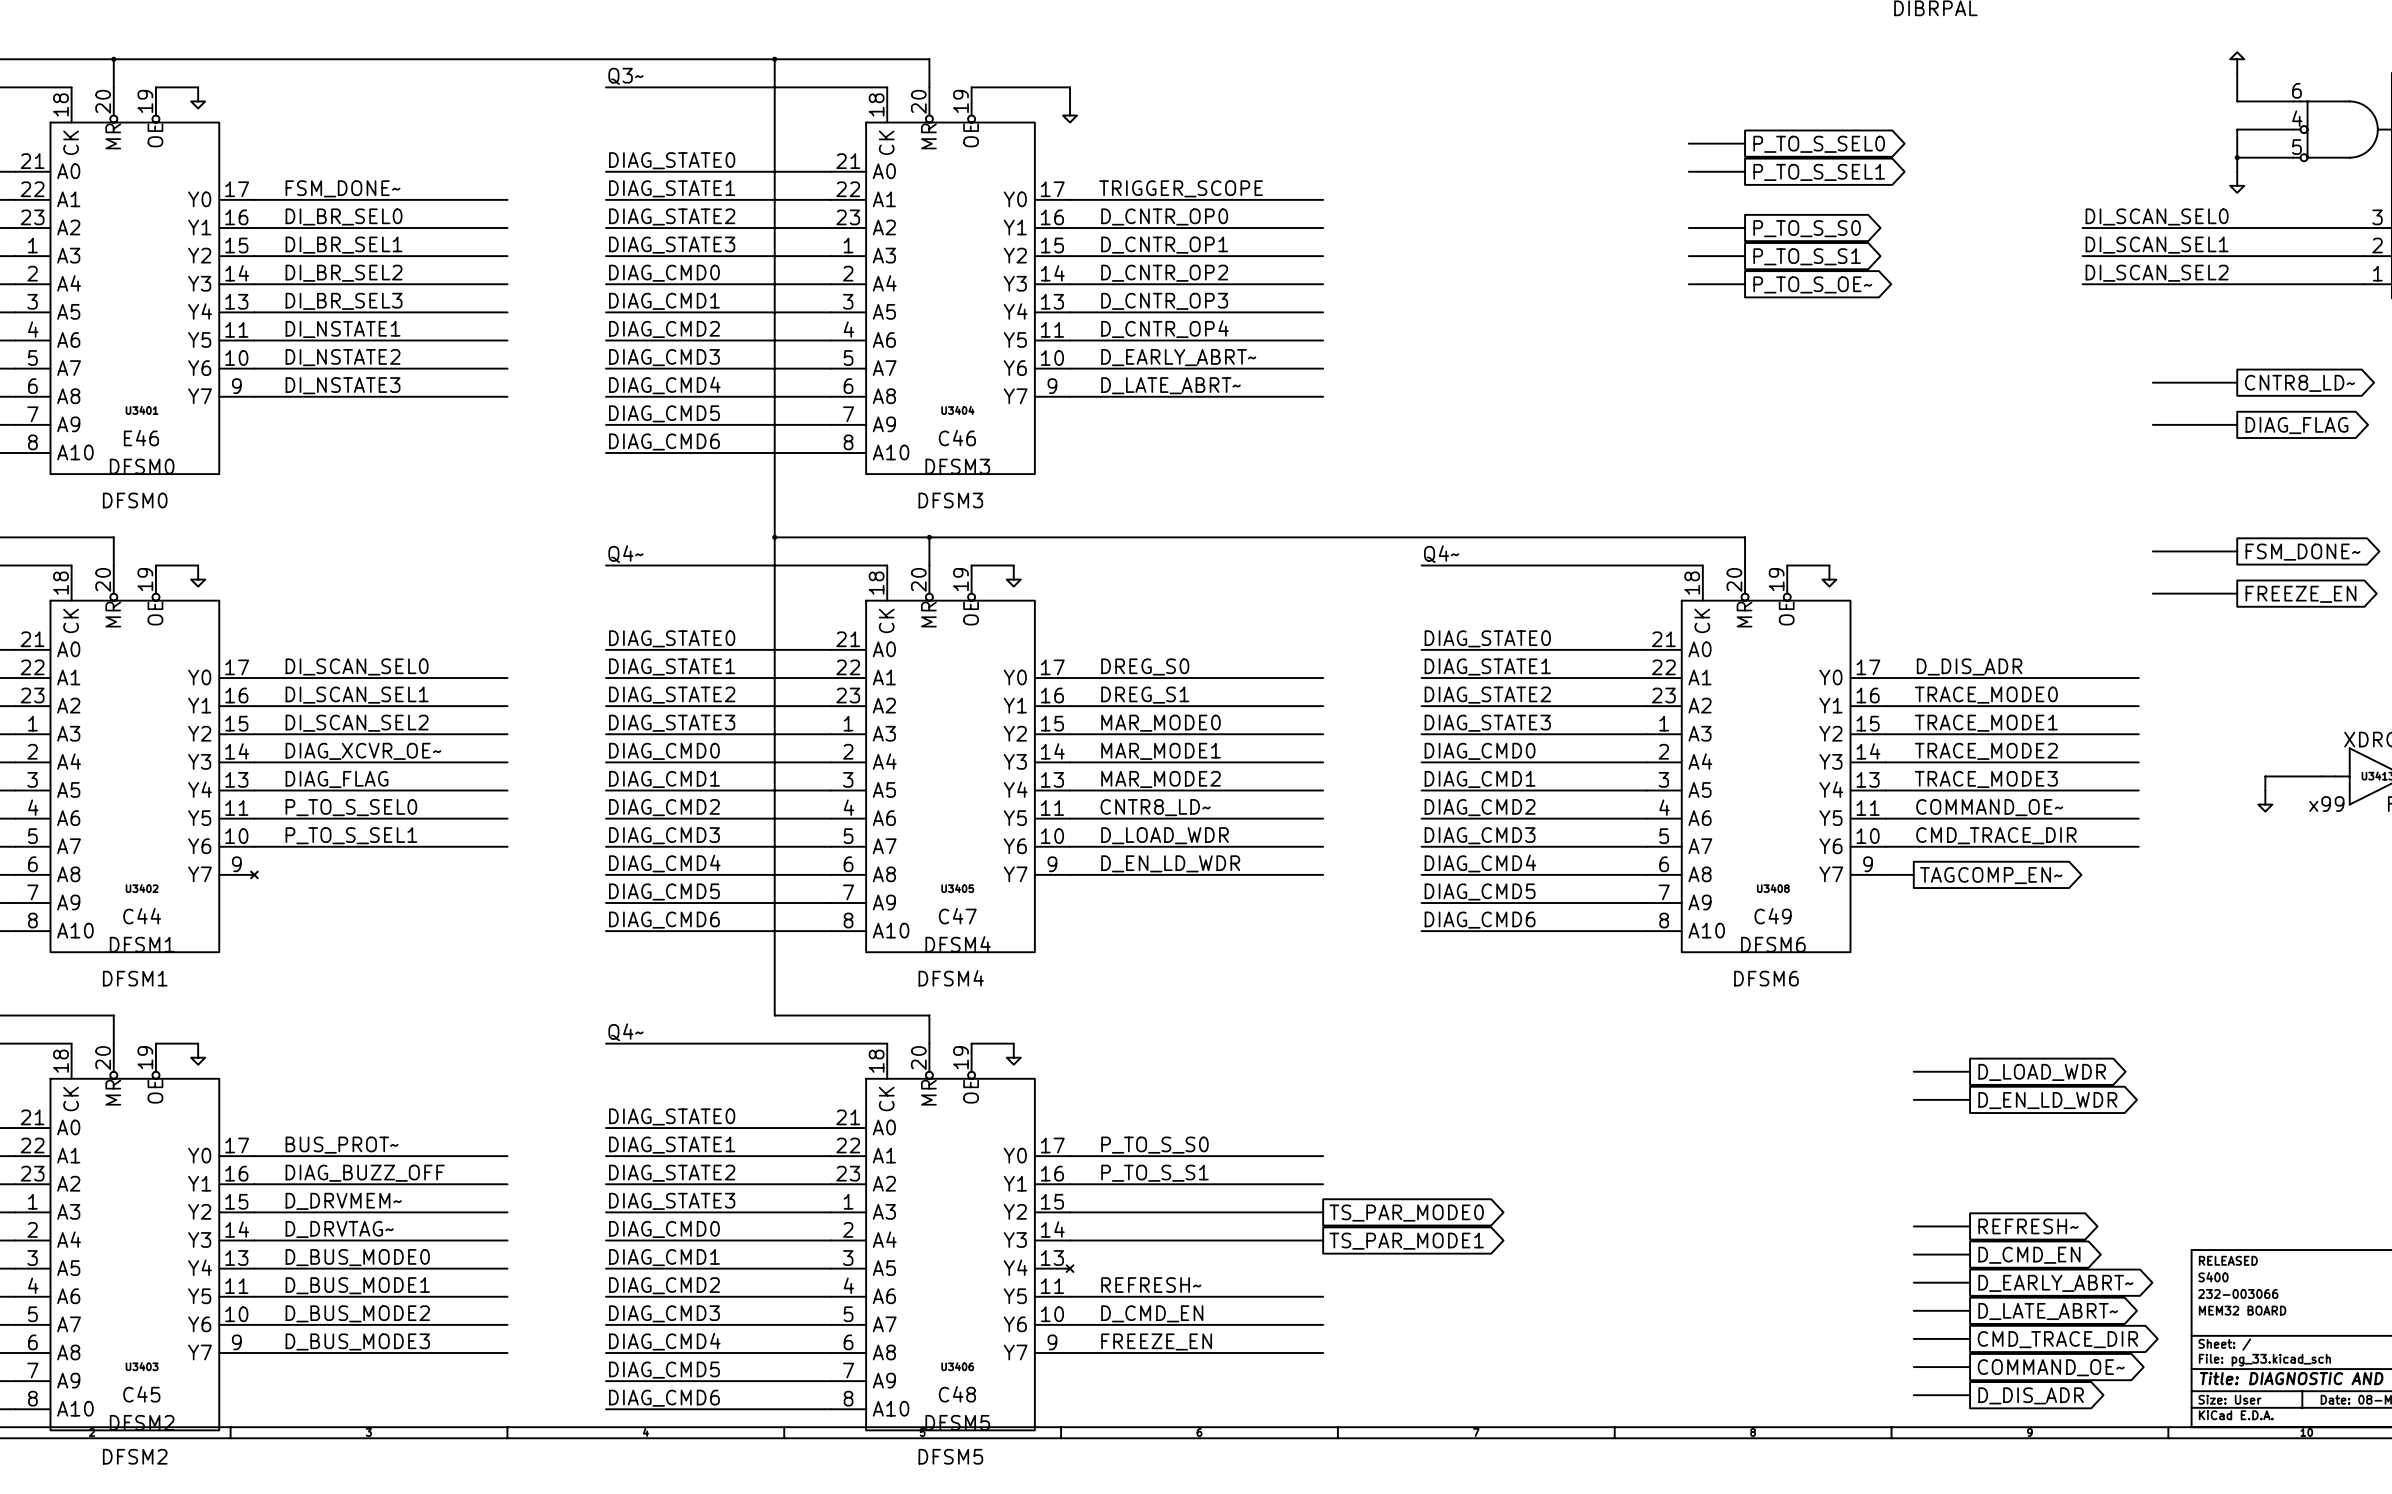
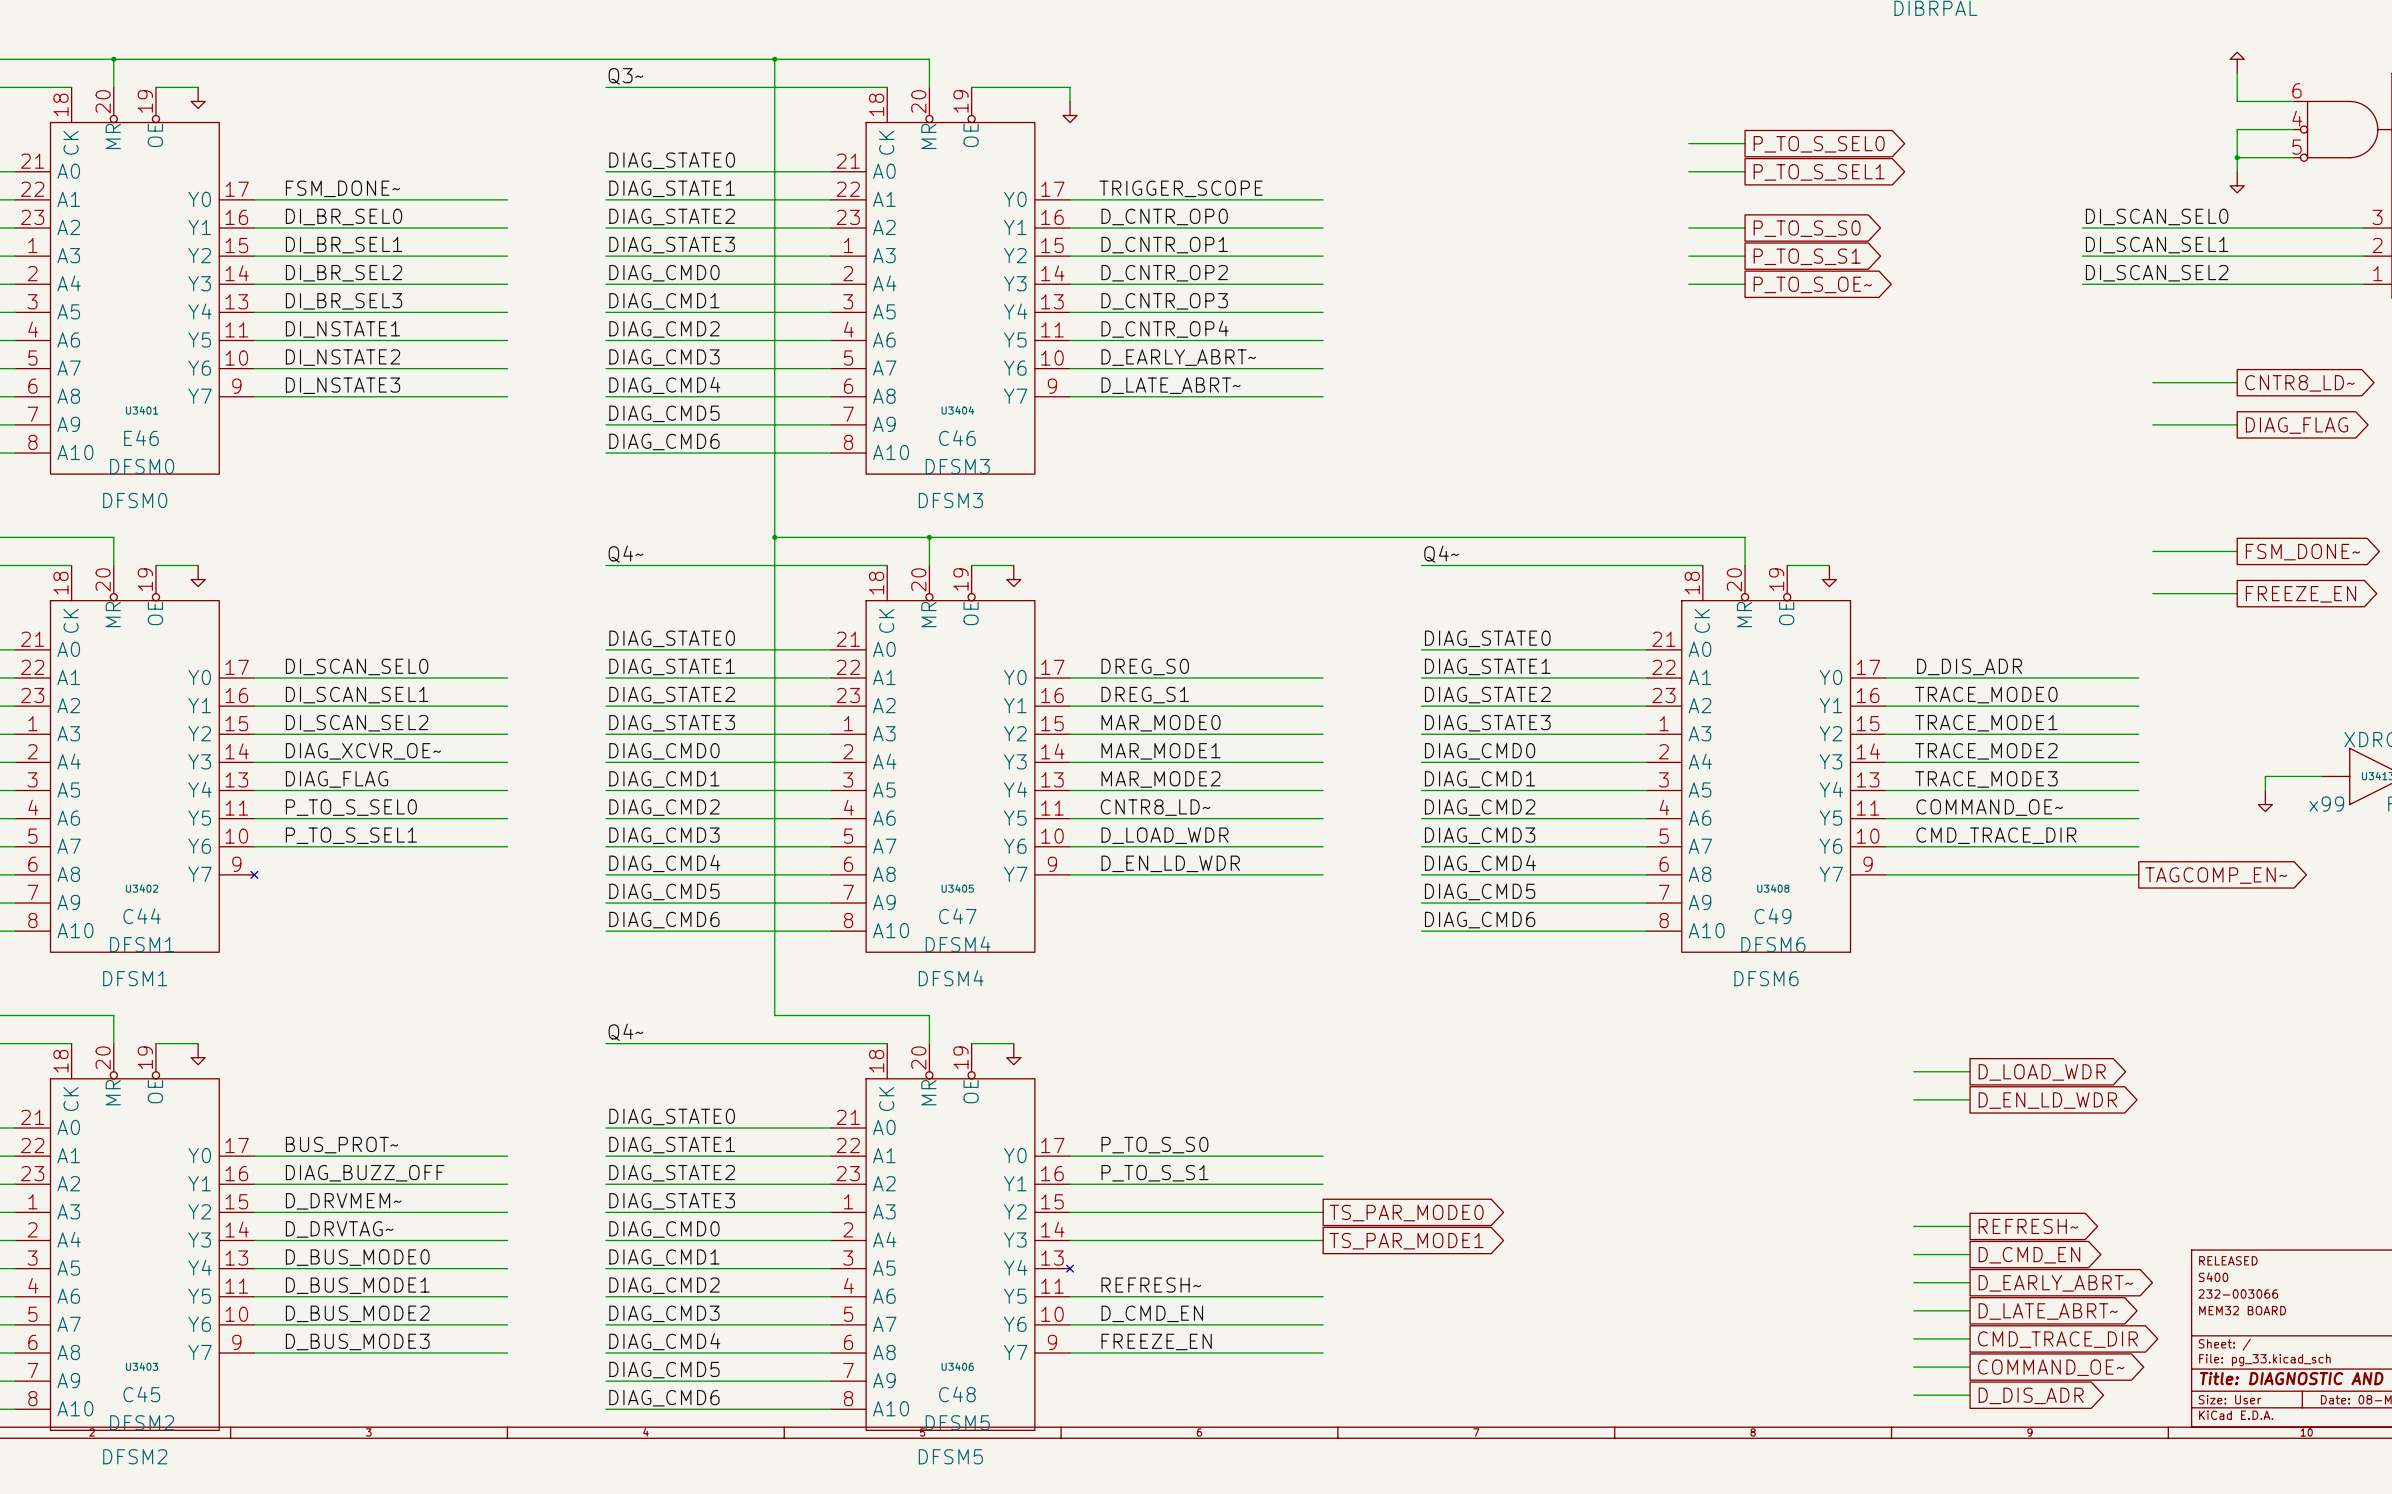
wire: none -> (1913, 874) (2138, 874)
global label: TAGCOMP_EN~ (1991, 875) -> none
global label: none -> TAGCOMP_EN~ (2216, 875)

